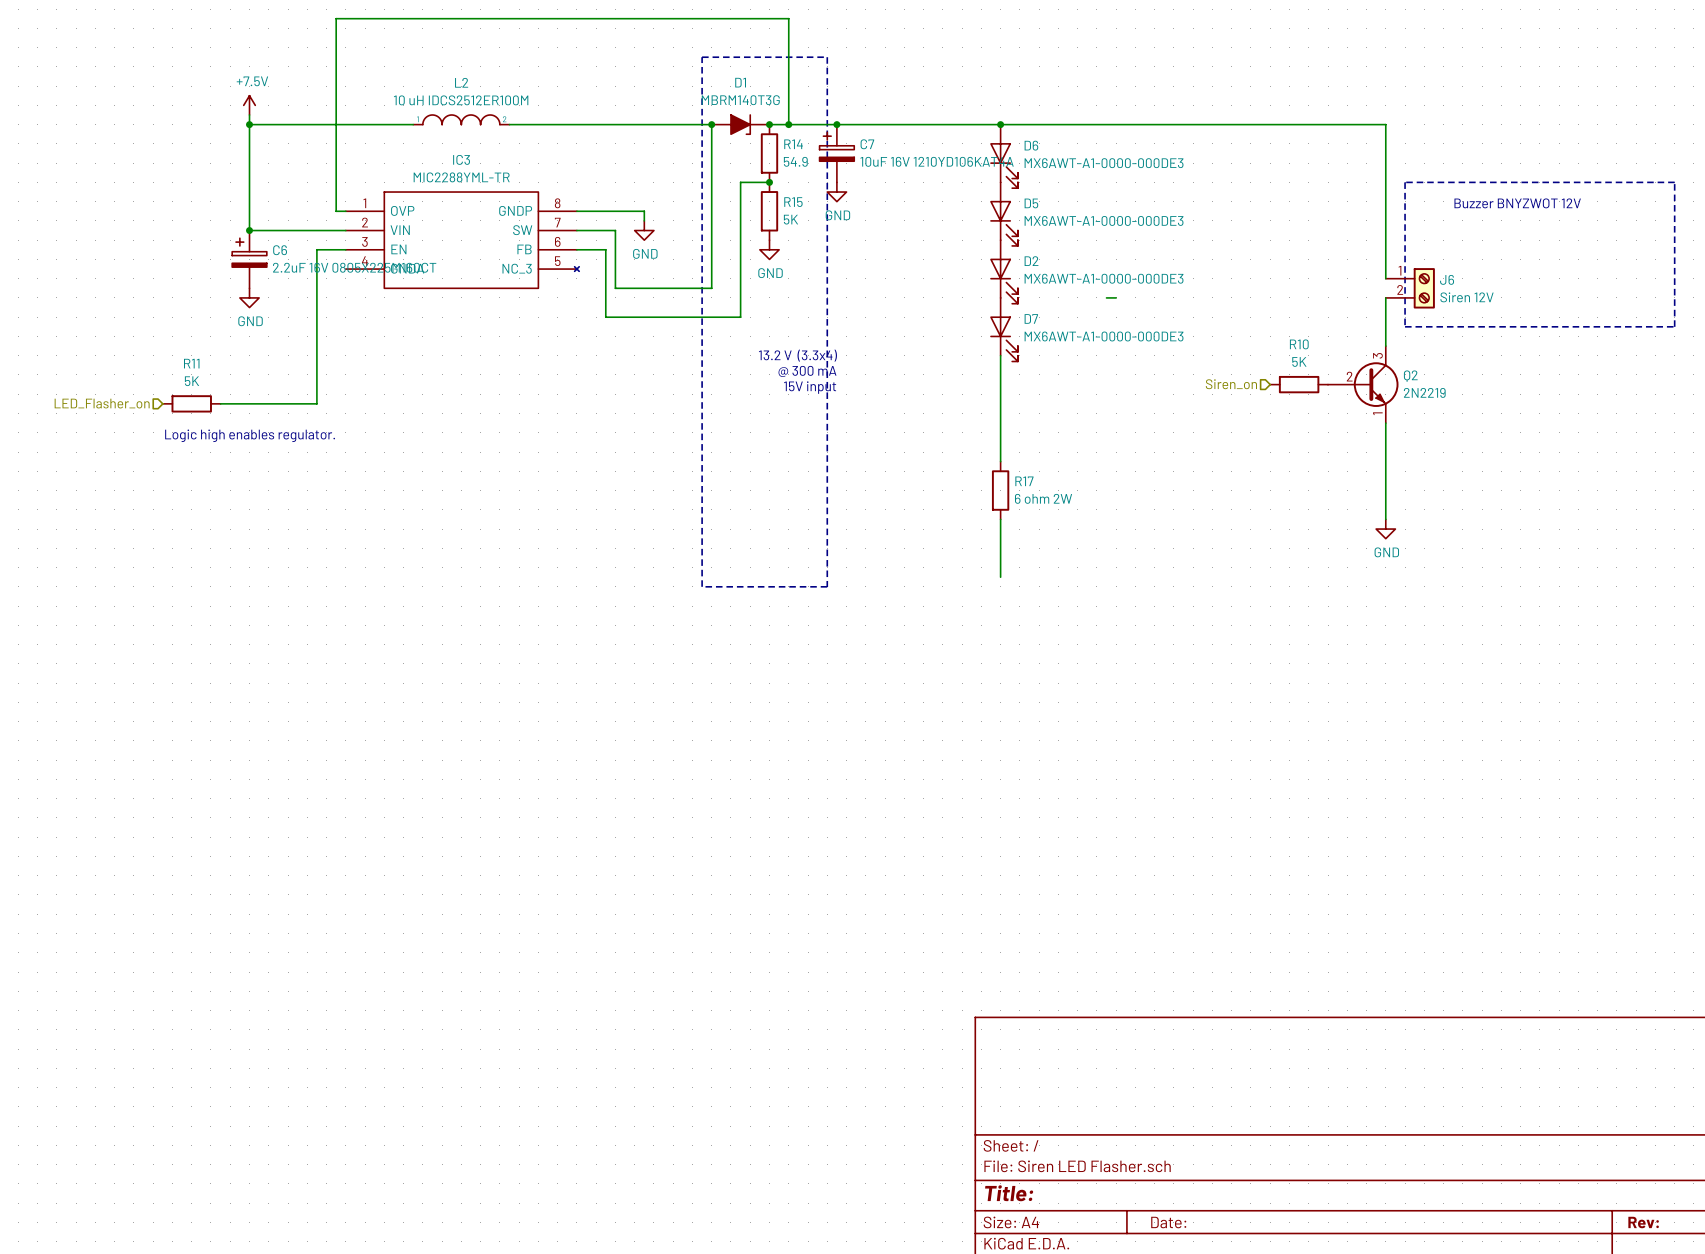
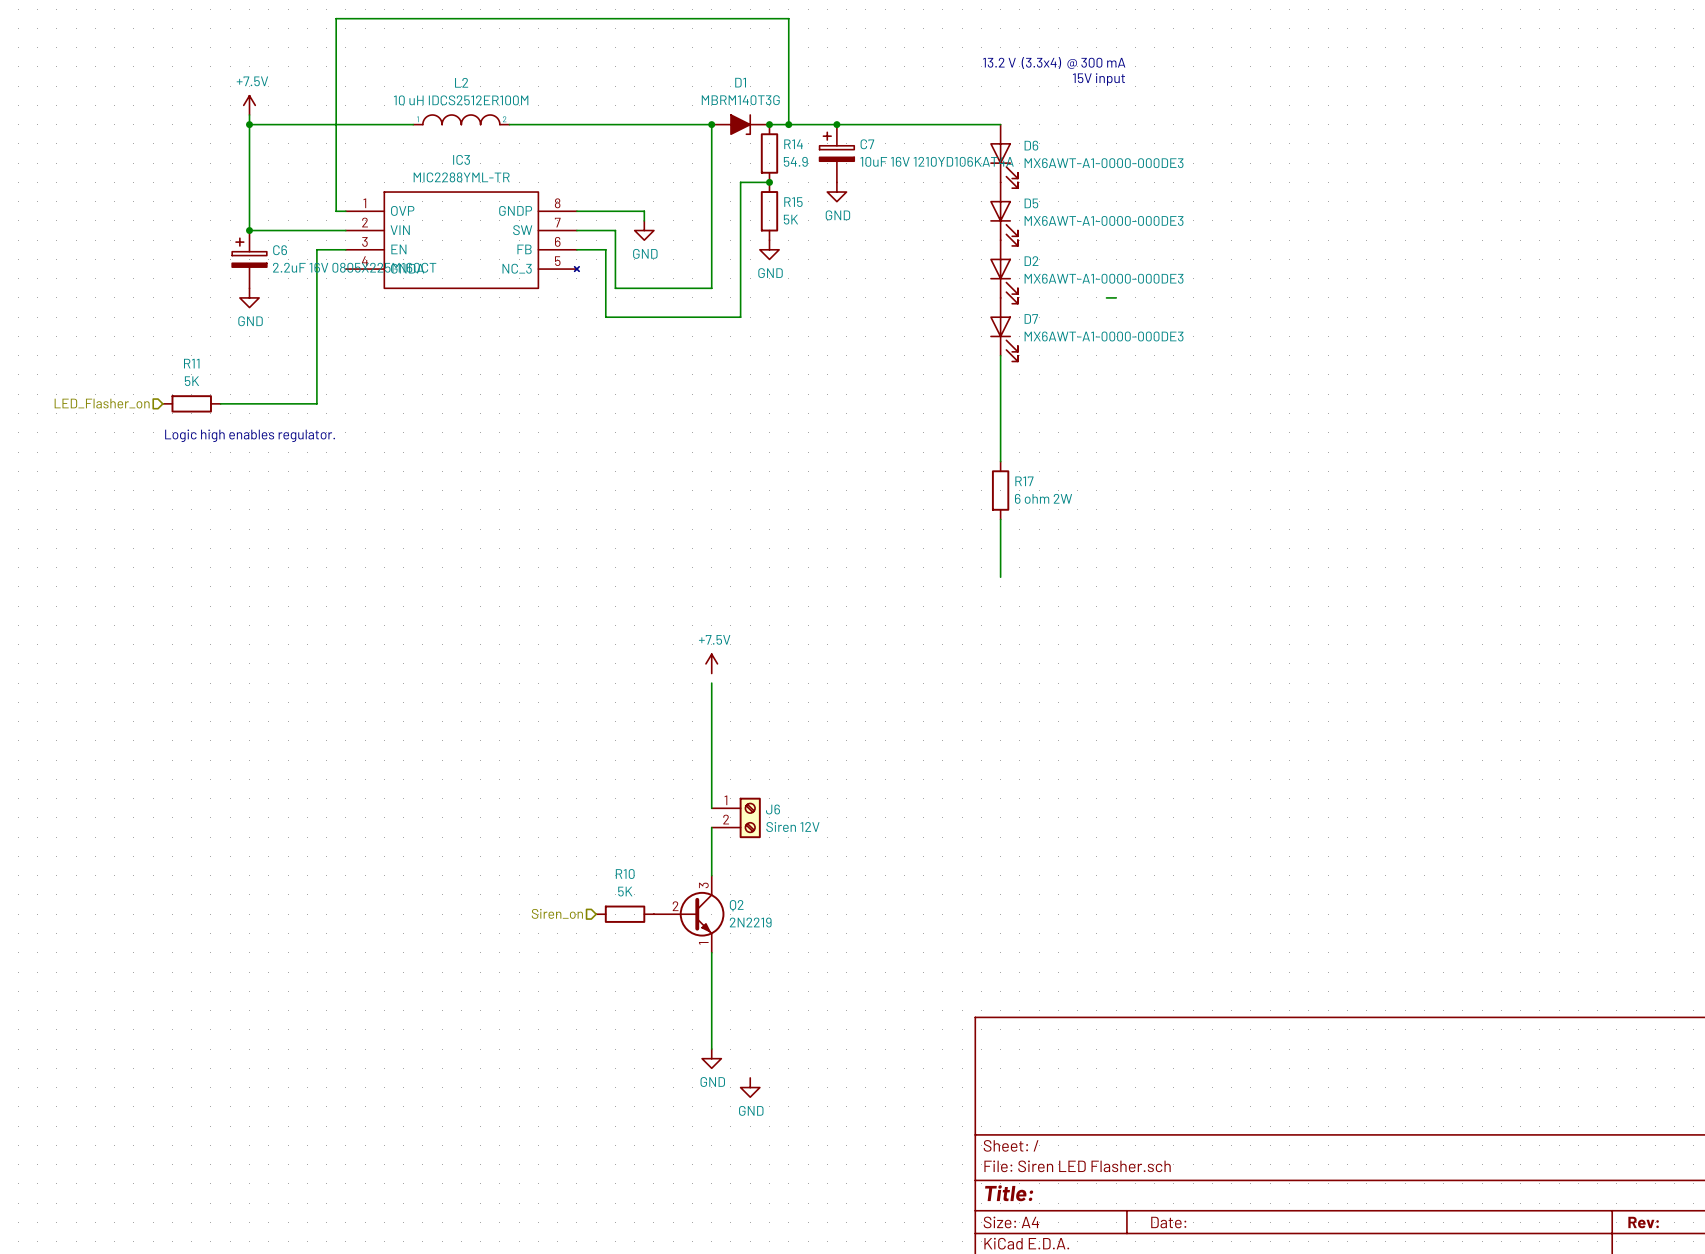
line: (702, 57) (702, 586) (827, 586) (827, 57) (702, 57) -> none
text: none -> 13.2 V (3.3x4) @ 300 mA (1054, 62)
text: none -> 15V input (1098, 79)
wire: (1000, 124) (1385, 124) (1385, 278) -> none
junction: (1000, 124) -> none
line: (1405, 182) (1674, 182) (1674, 326) (1405, 326) (1405, 182) -> none
text: Buzzer BNYZWOT 12V (1517, 203) -> none
J6 position: (1410, 288) -> (736, 817)
wire: (1385, 297) (1385, 346) -> none
text: 13.2 V (3.3x4) (797, 355) -> none
text: @ 300 mA (807, 371) -> none
hierarchical label: Siren_on (1231, 384) -> none
R10 position: (1299, 384) -> (625, 914)
Q2 position: (1363, 384) -> (689, 914)
text: 15V input (810, 387) -> none
wire: (1385, 423) (1385, 519) -> none
power symbol: GND (1385, 529) -> none
power symbol: none -> +7.5V (711, 663)
wire: none -> (711, 683) (711, 808)
wire: none -> (711, 827) (711, 875)
hierarchical label: none -> Siren_on (557, 913)
wire: none -> (711, 952) (711, 1049)
power symbol: none -> GND (711, 1058)
power symbol: none -> GND (750, 1087)

